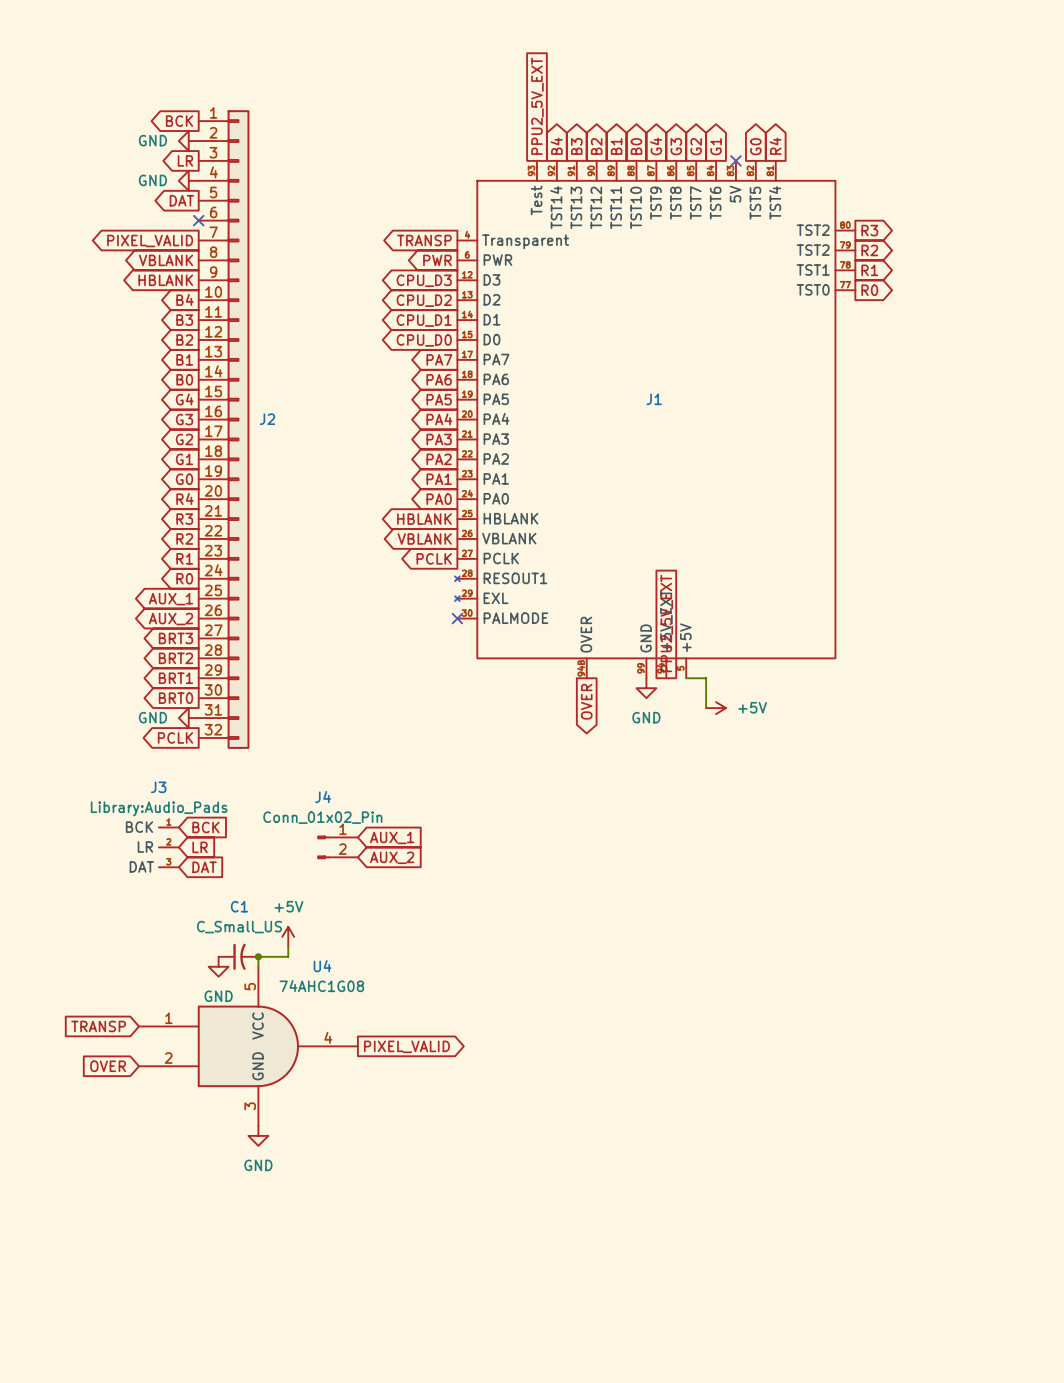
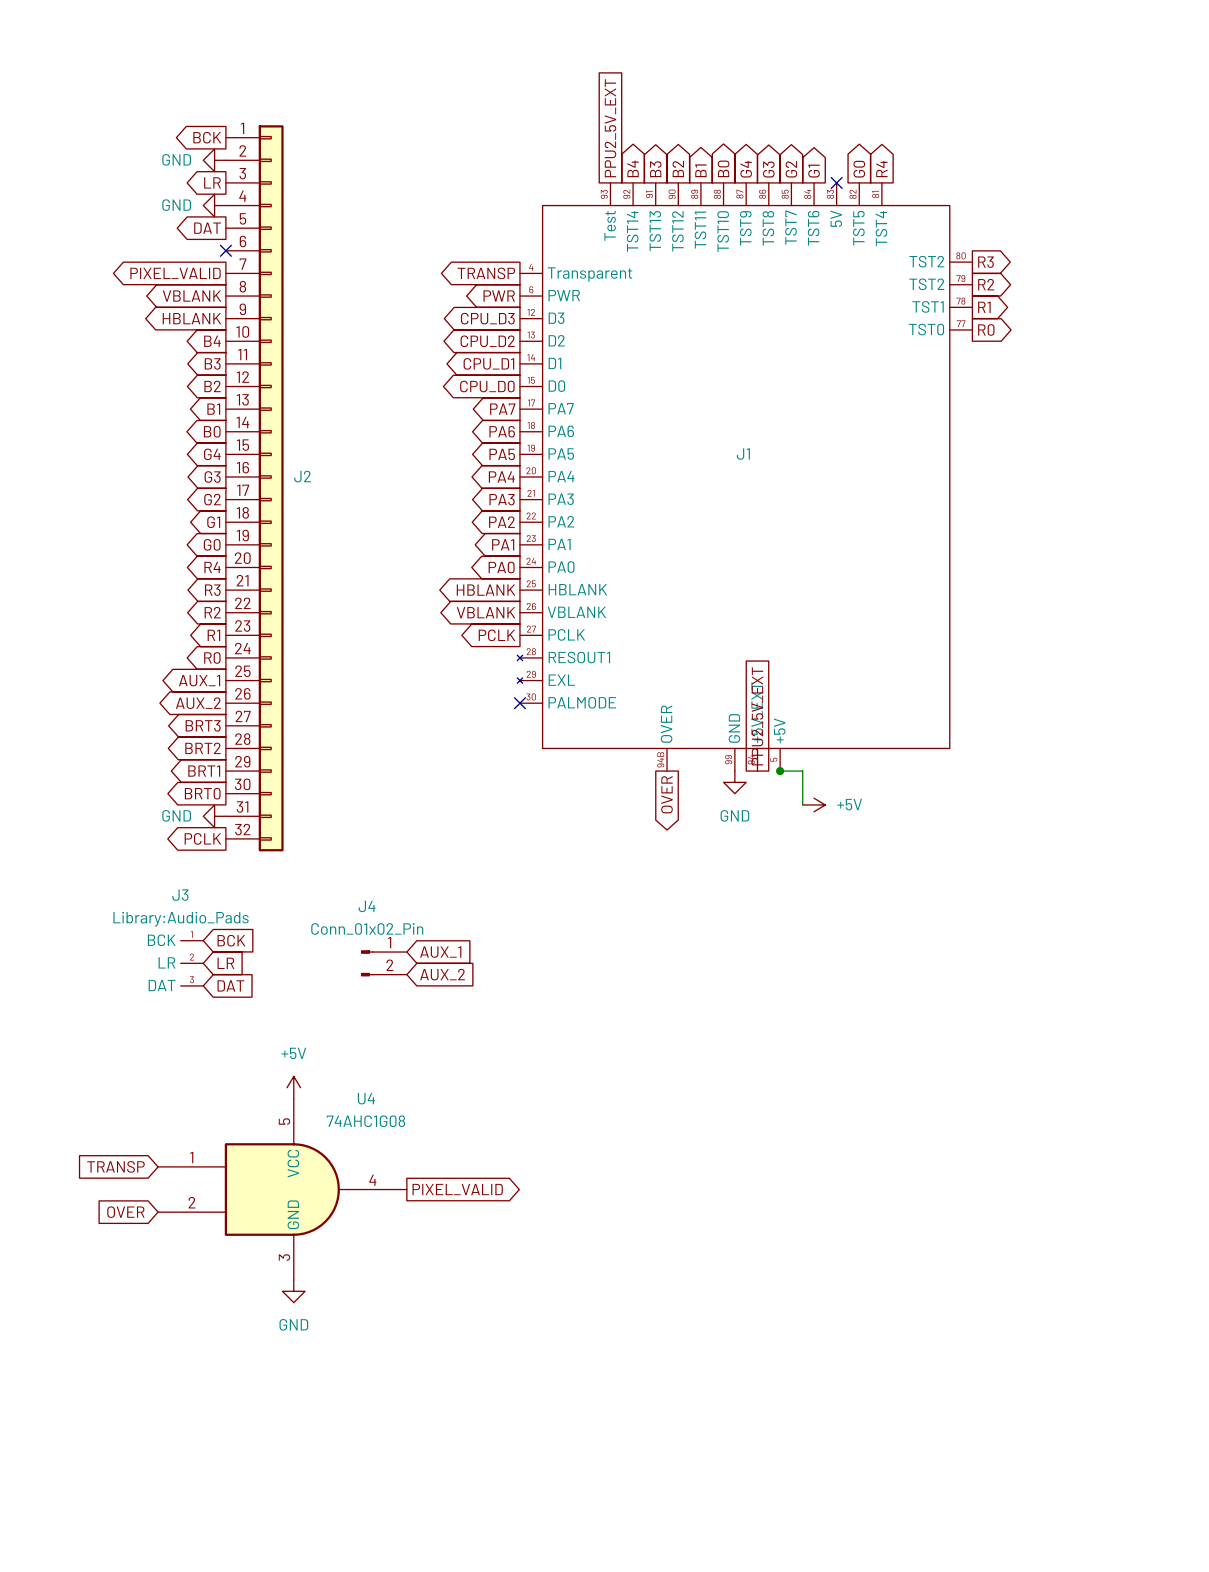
junction: none -> (780, 771)
power symbol position: +5V (288, 936) -> +5V (293, 1087)
wire: (288, 946) (288, 956) (258, 956) (258, 966) -> none
C1: C_Small_US (238, 956) -> none
junction: (258, 956) -> none
power symbol: GND (218, 966) -> none

